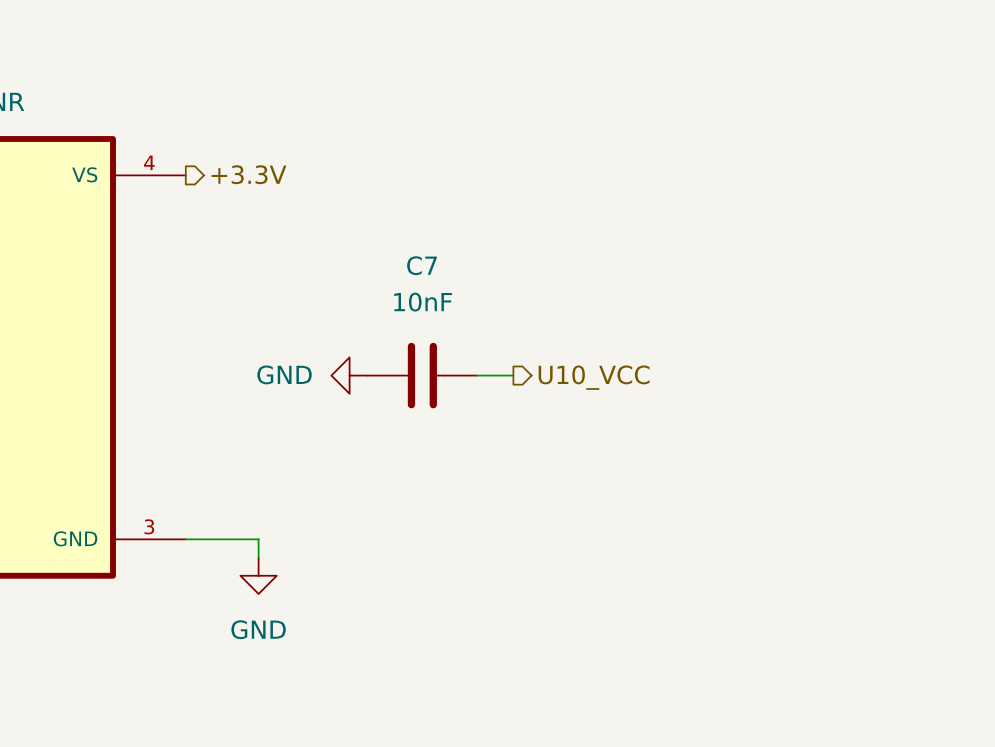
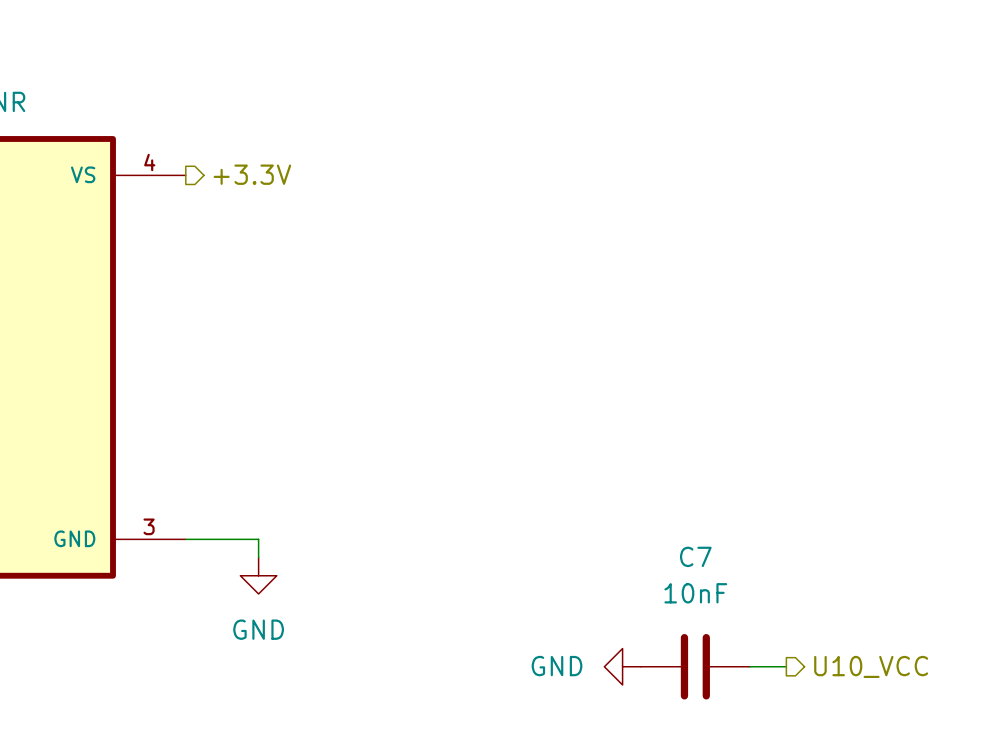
power symbol: GND (349, 375) -> none
C7 position: (422, 375) -> (695, 666)
wire: (476, 375) (513, 375) -> none
hierarchical label: U10_VCC (594, 377) -> none
power symbol: none -> GND (622, 666)
wire: none -> (749, 666) (786, 666)
hierarchical label: none -> U10_VCC (871, 666)

